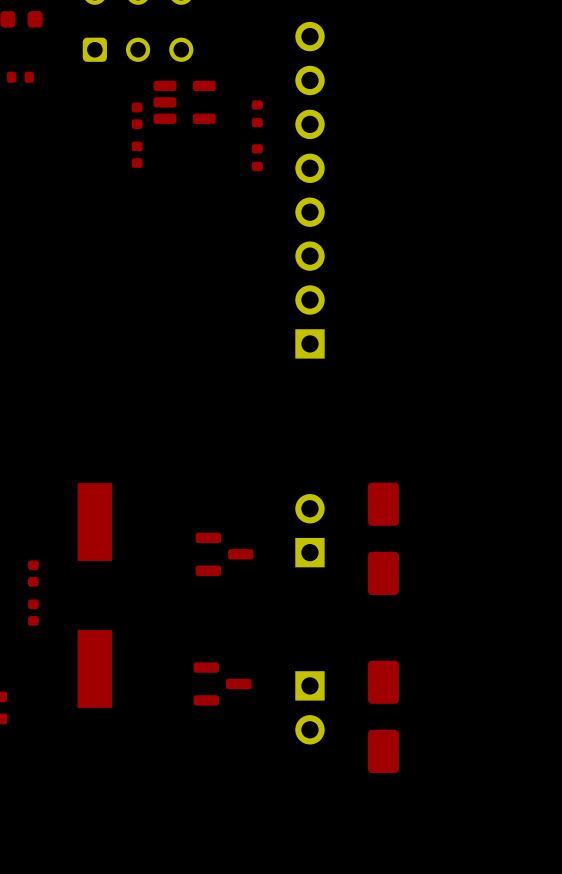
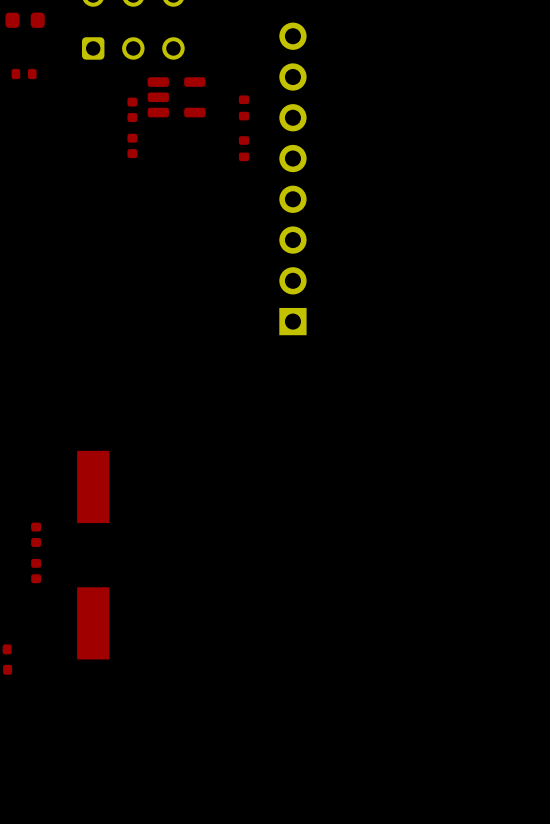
part: (309, 530) -> none
part: (383, 538) -> none
part: (224, 554) -> none
part: (222, 683) -> none
part: (309, 707) -> none
part: (383, 716) -> none

